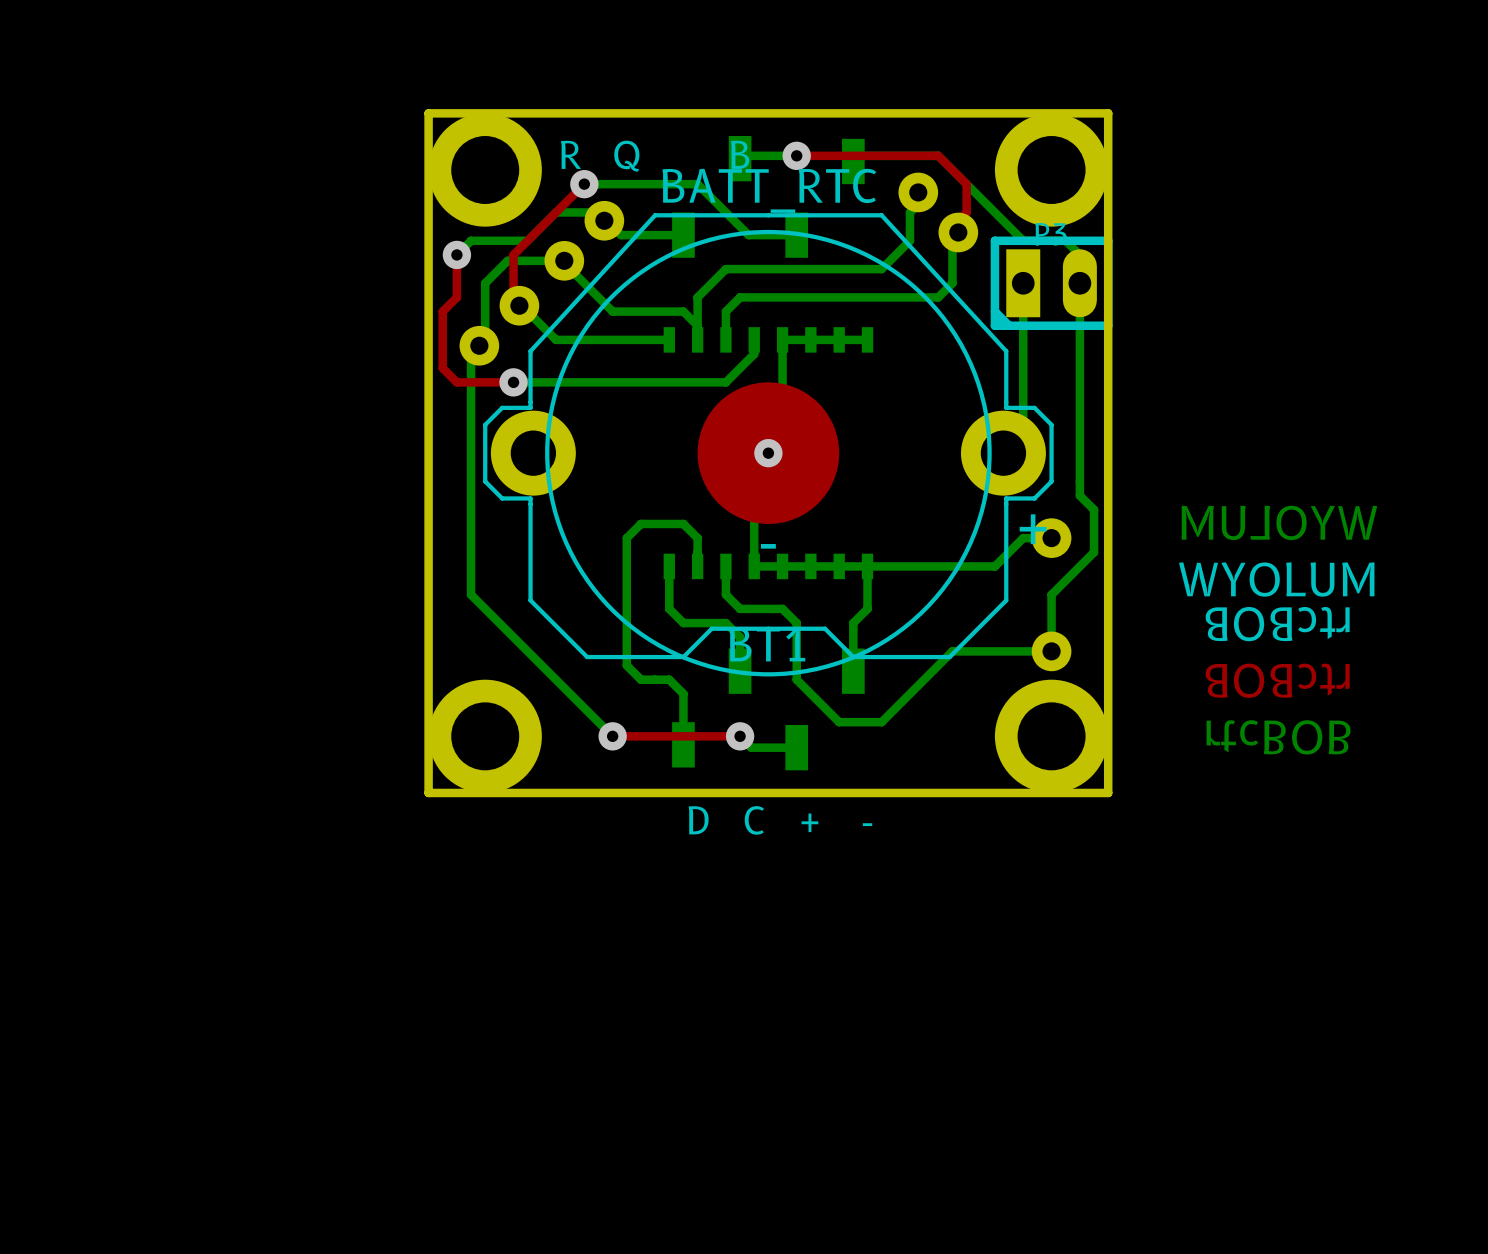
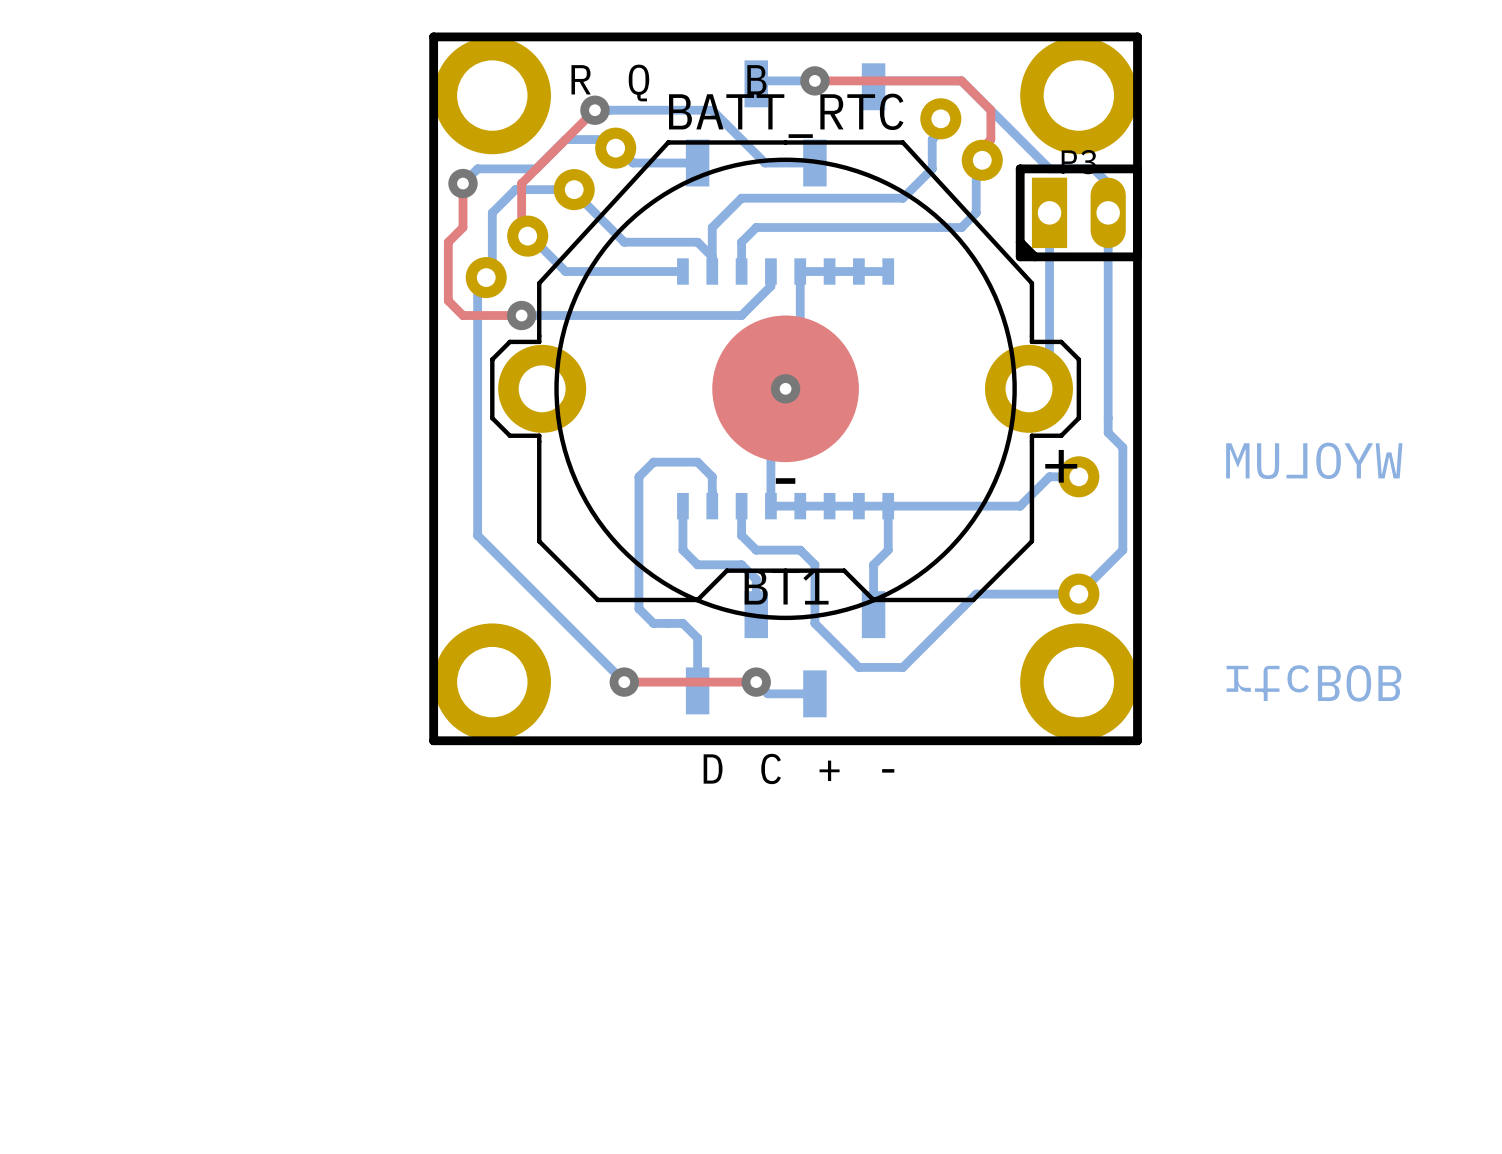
bottom track: (1094, 552) (1051, 594) (1051, 651) -> (1122, 491) (1122, 550) (1078, 594)
text: WYOLUM (1276, 579) -> none
text: rtcBOB (1277, 624) -> none
text: rtcBOB (1277, 680) -> none

